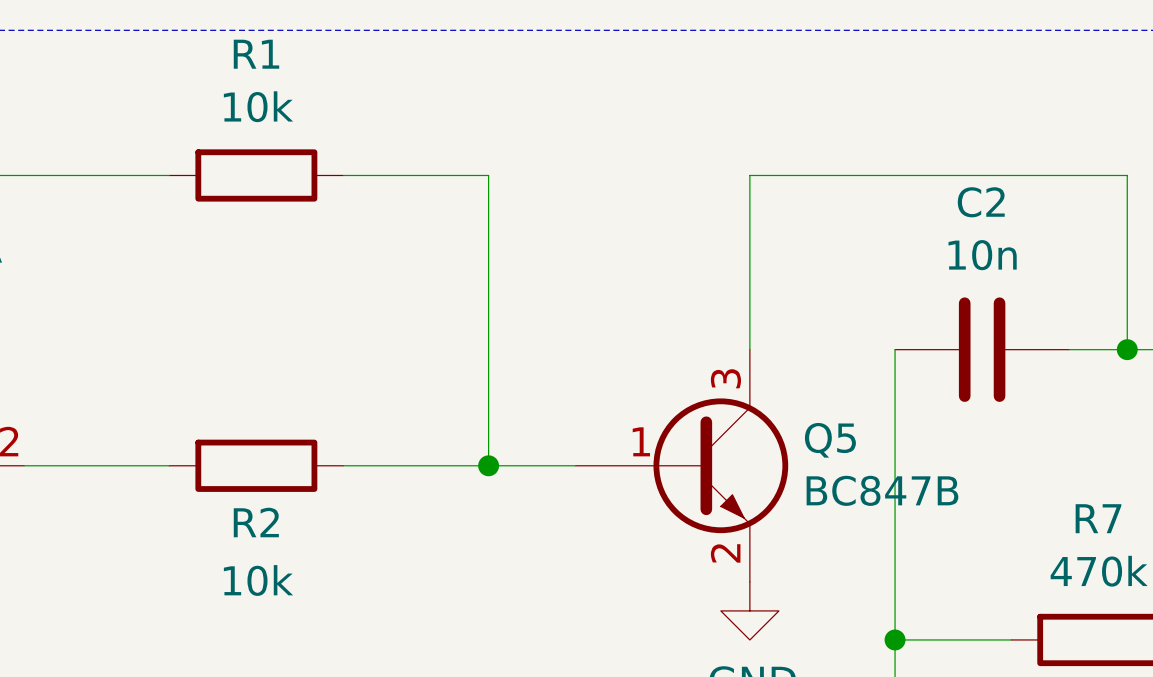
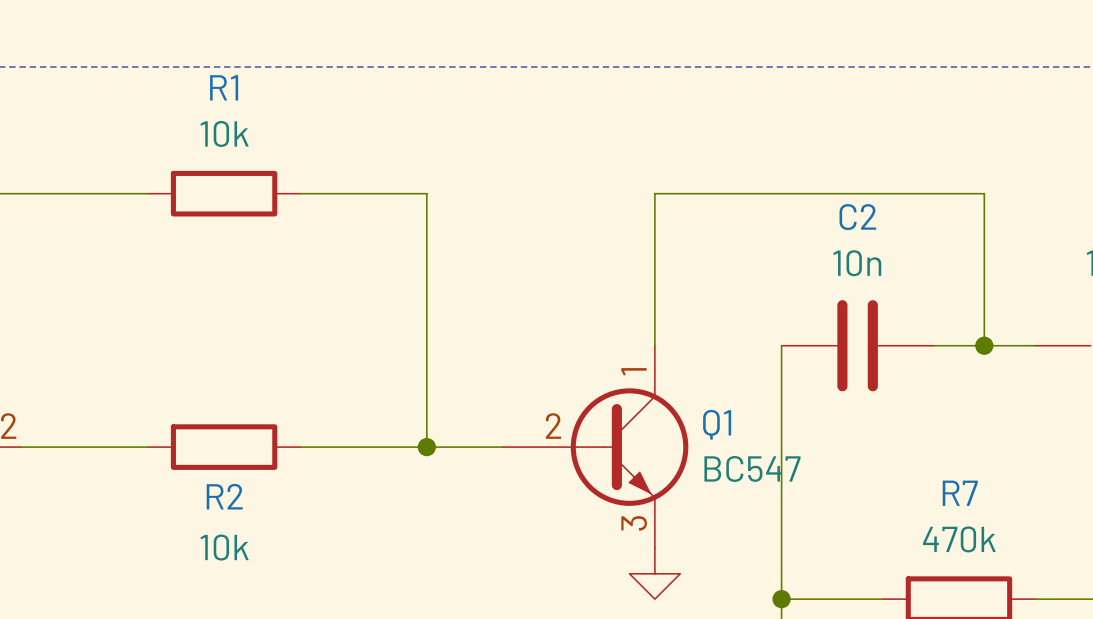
Q5: BC847B (681, 465) -> none
Q1: none -> BC547 (595, 447)

